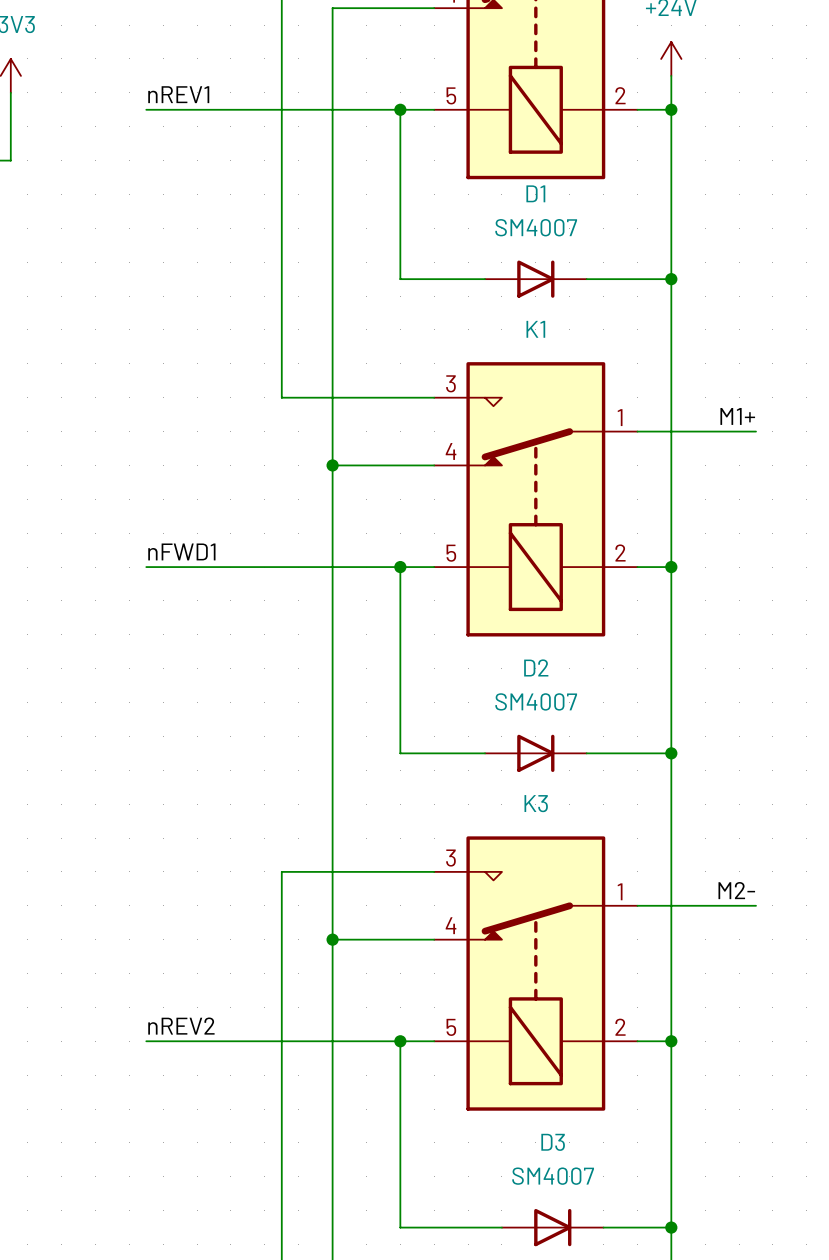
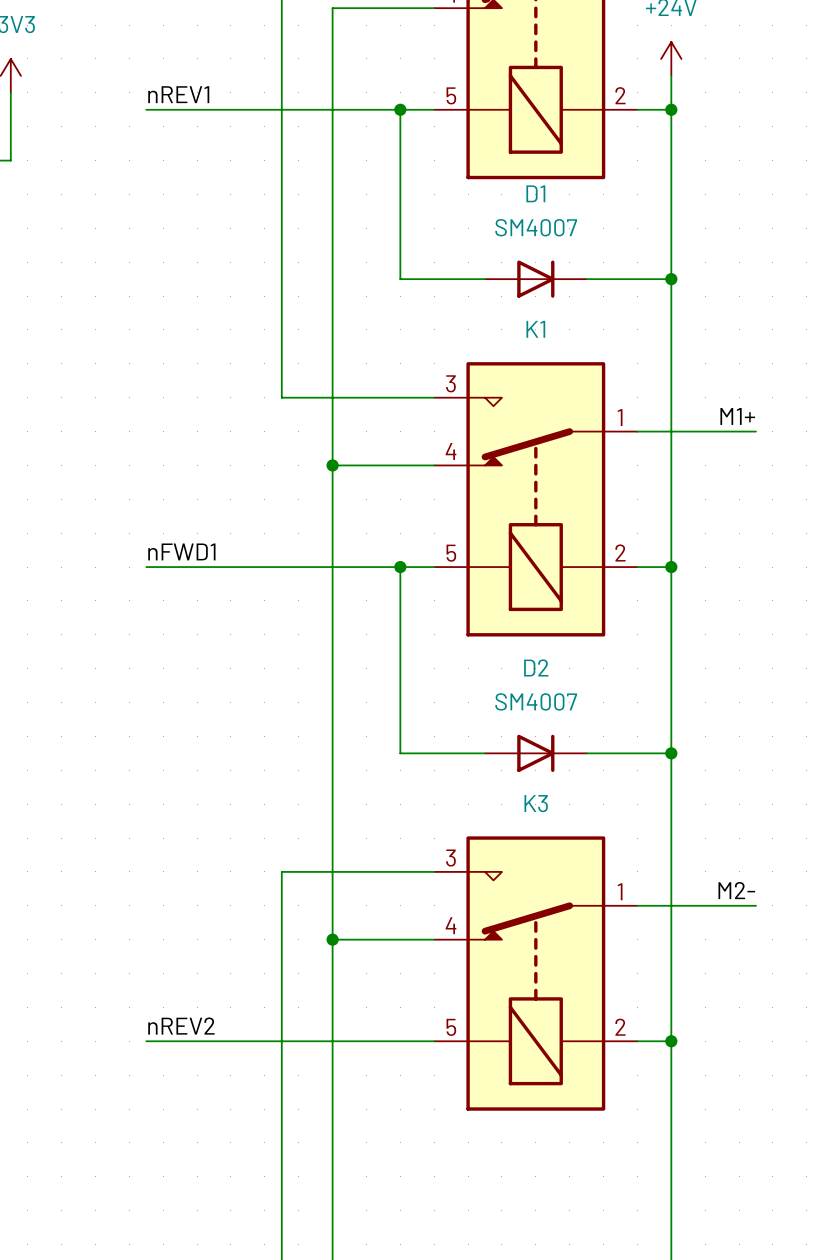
wire: (400, 1041) (400, 1227) (501, 1227) -> none
junction: (400, 1041) -> none
D3: SM4007 (552, 1227) -> none
wire: (603, 1227) (671, 1227) -> none
junction: (671, 1227) -> none

